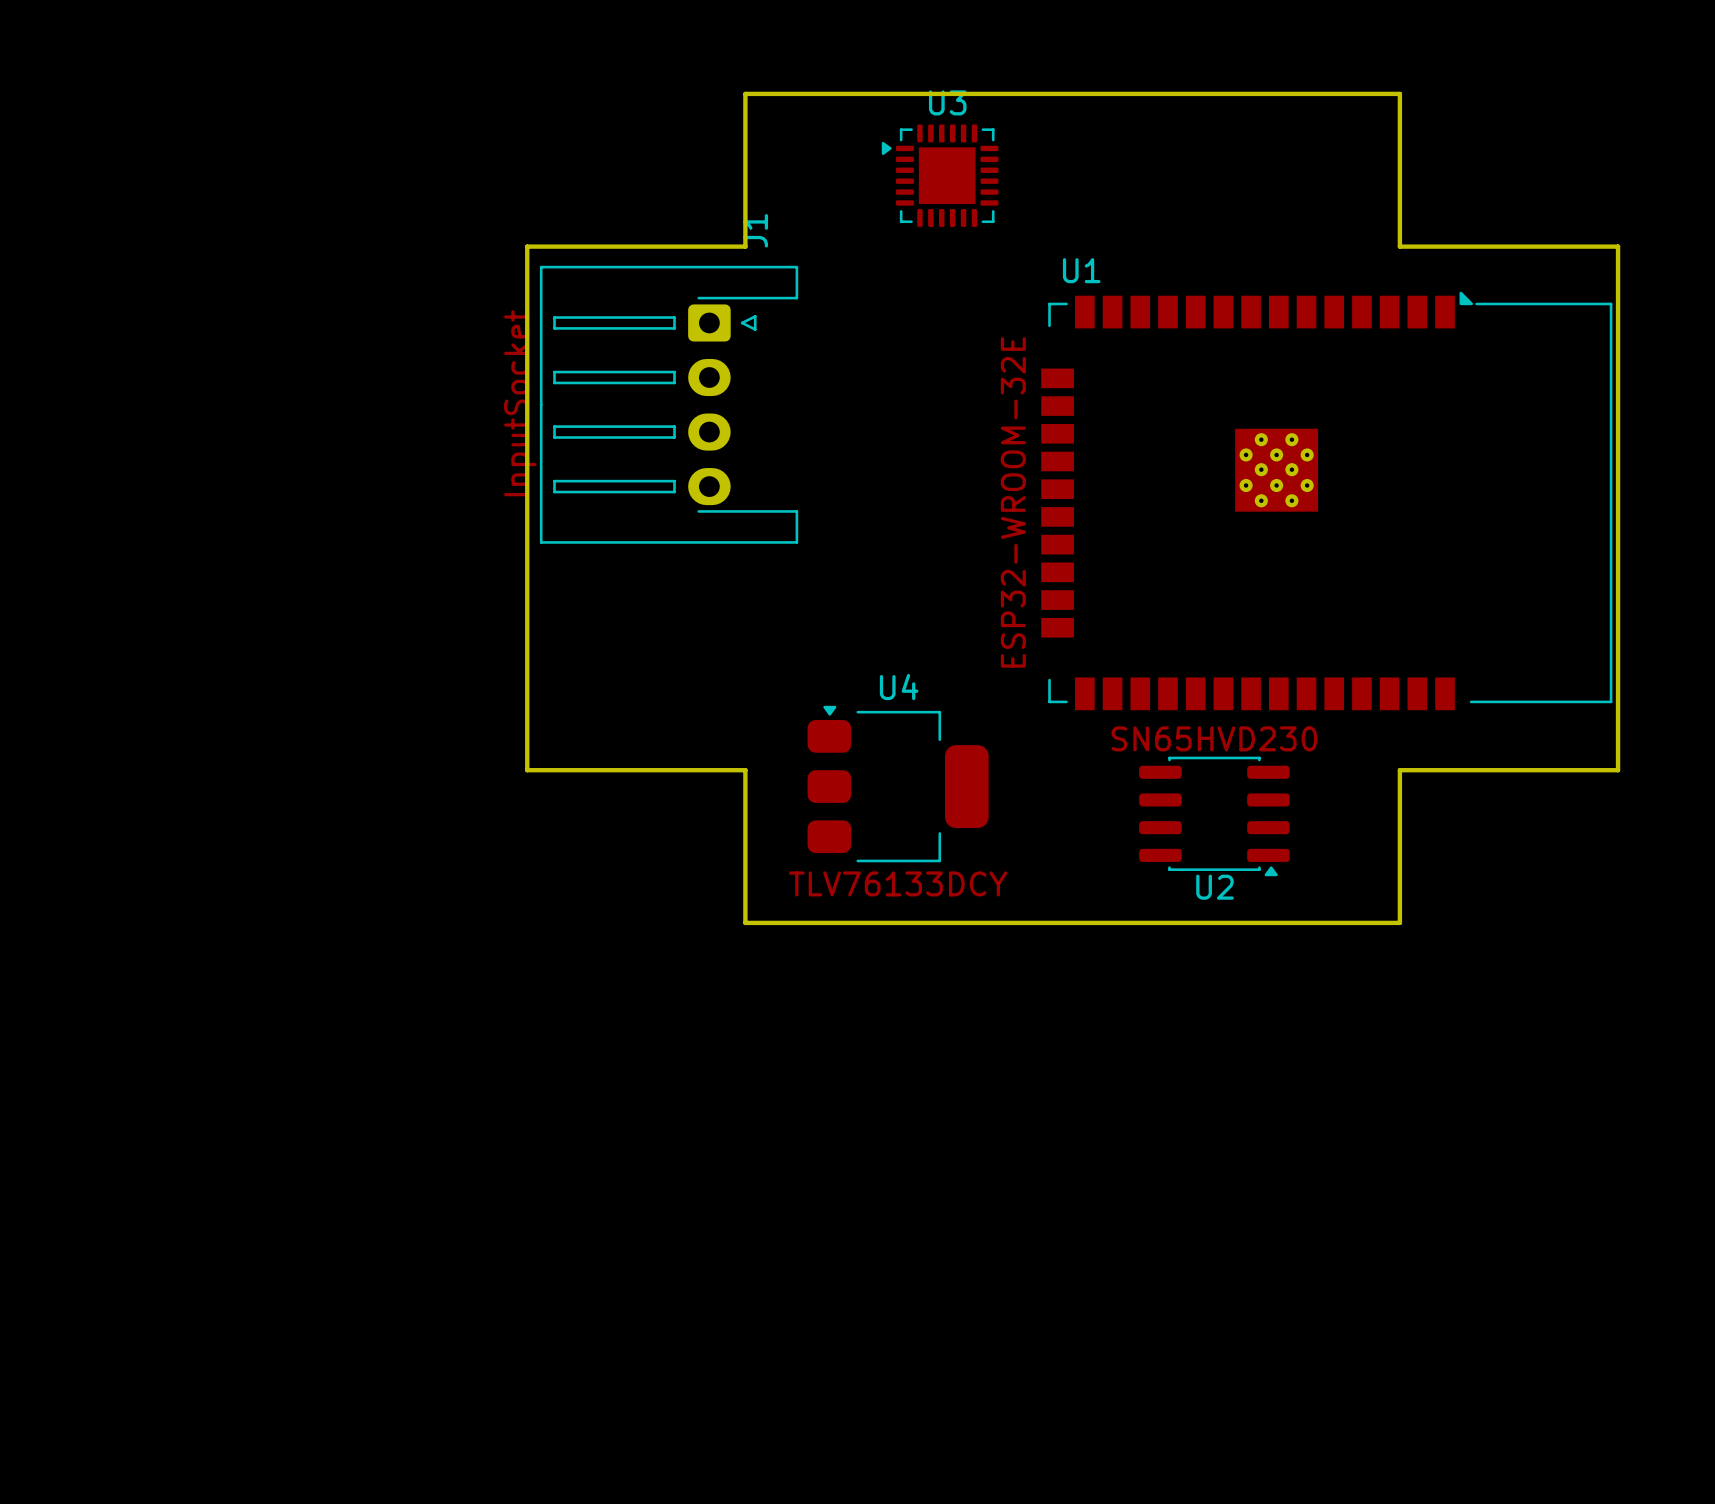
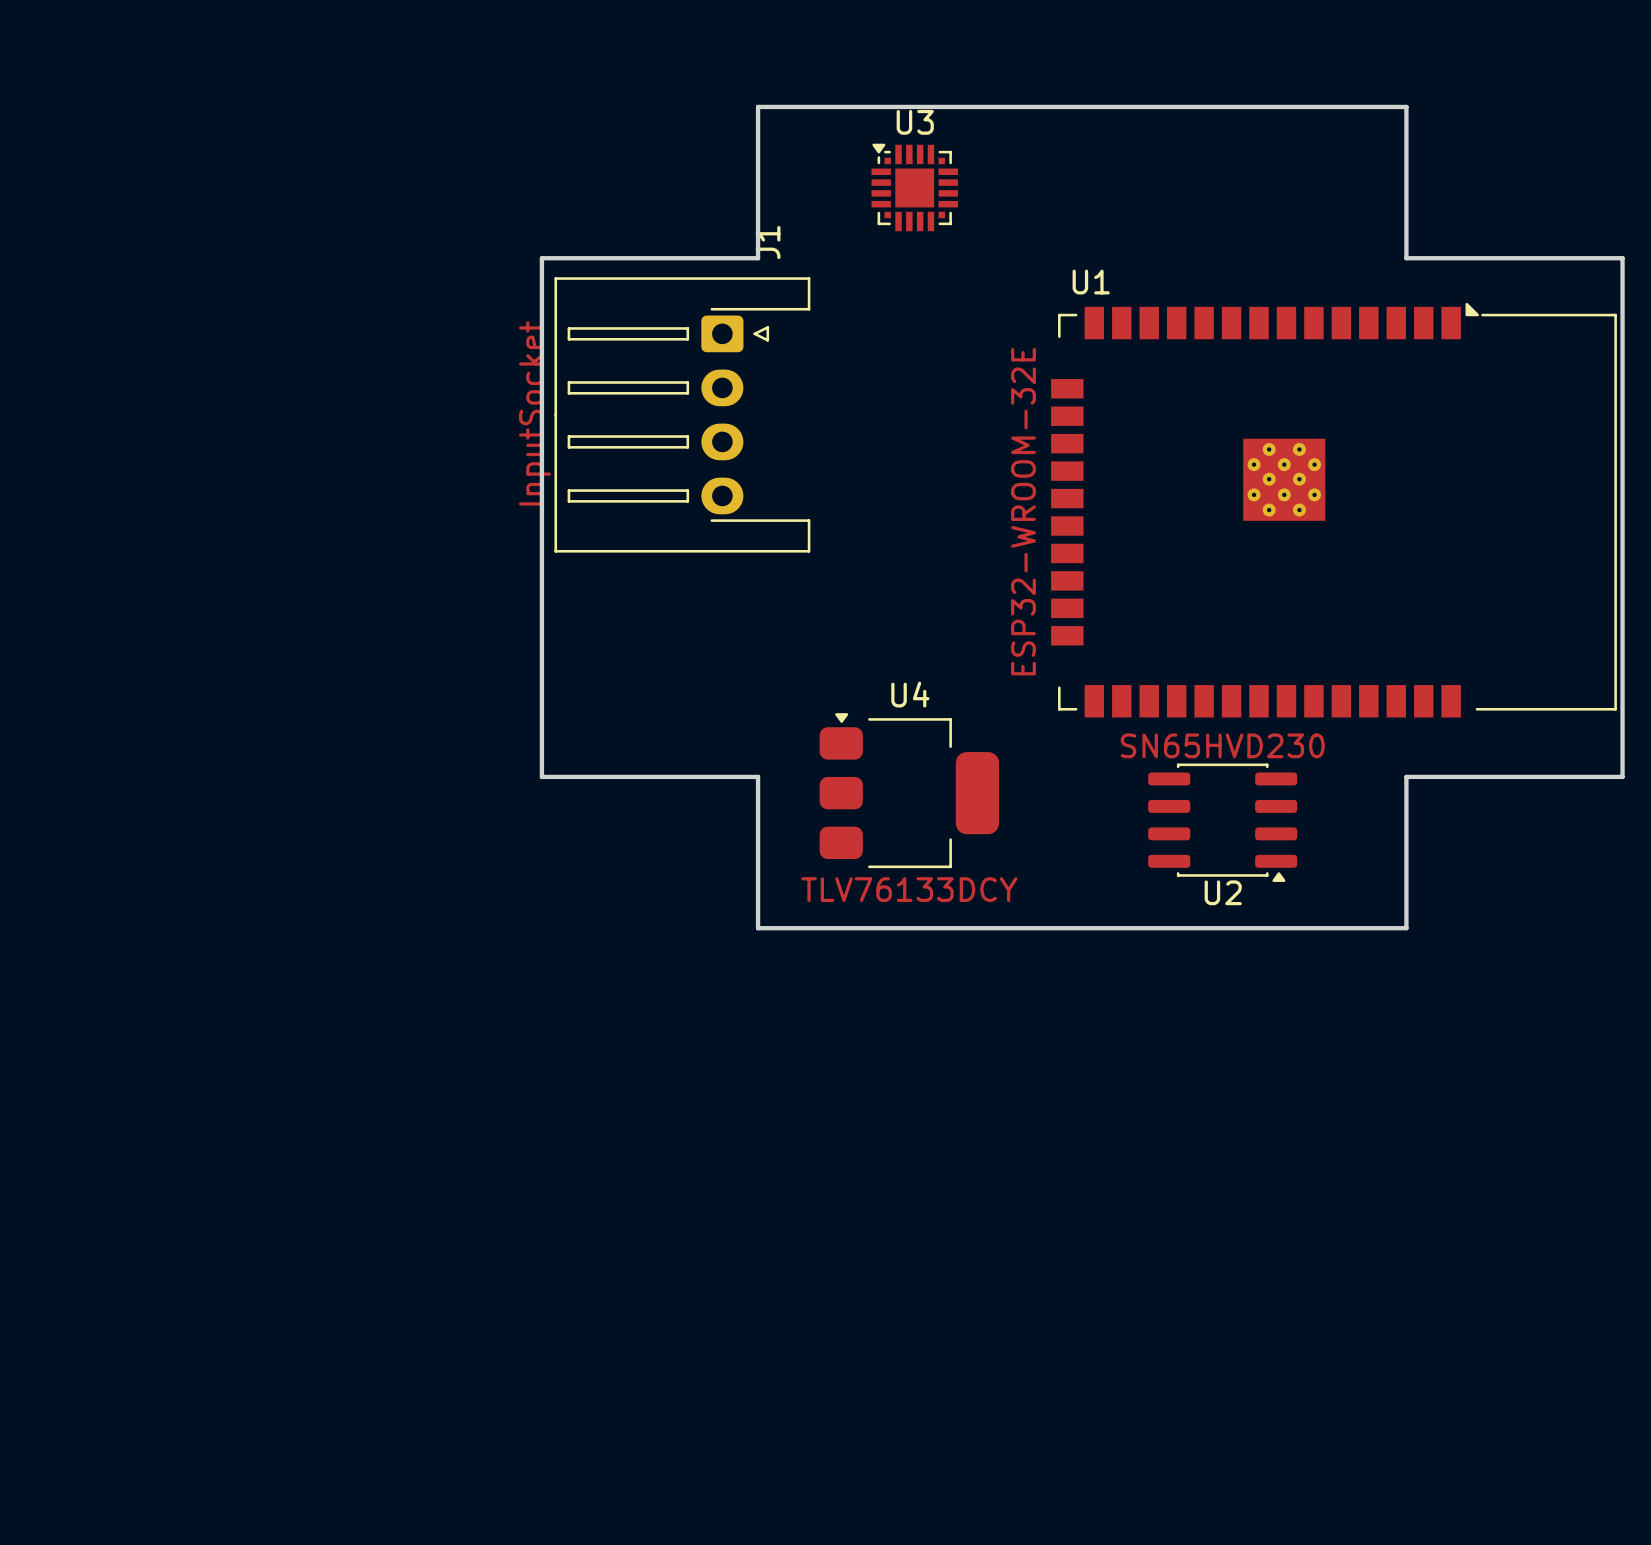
U3 footprint: [881, 124, 999, 227] -> [871, 143, 958, 232]

